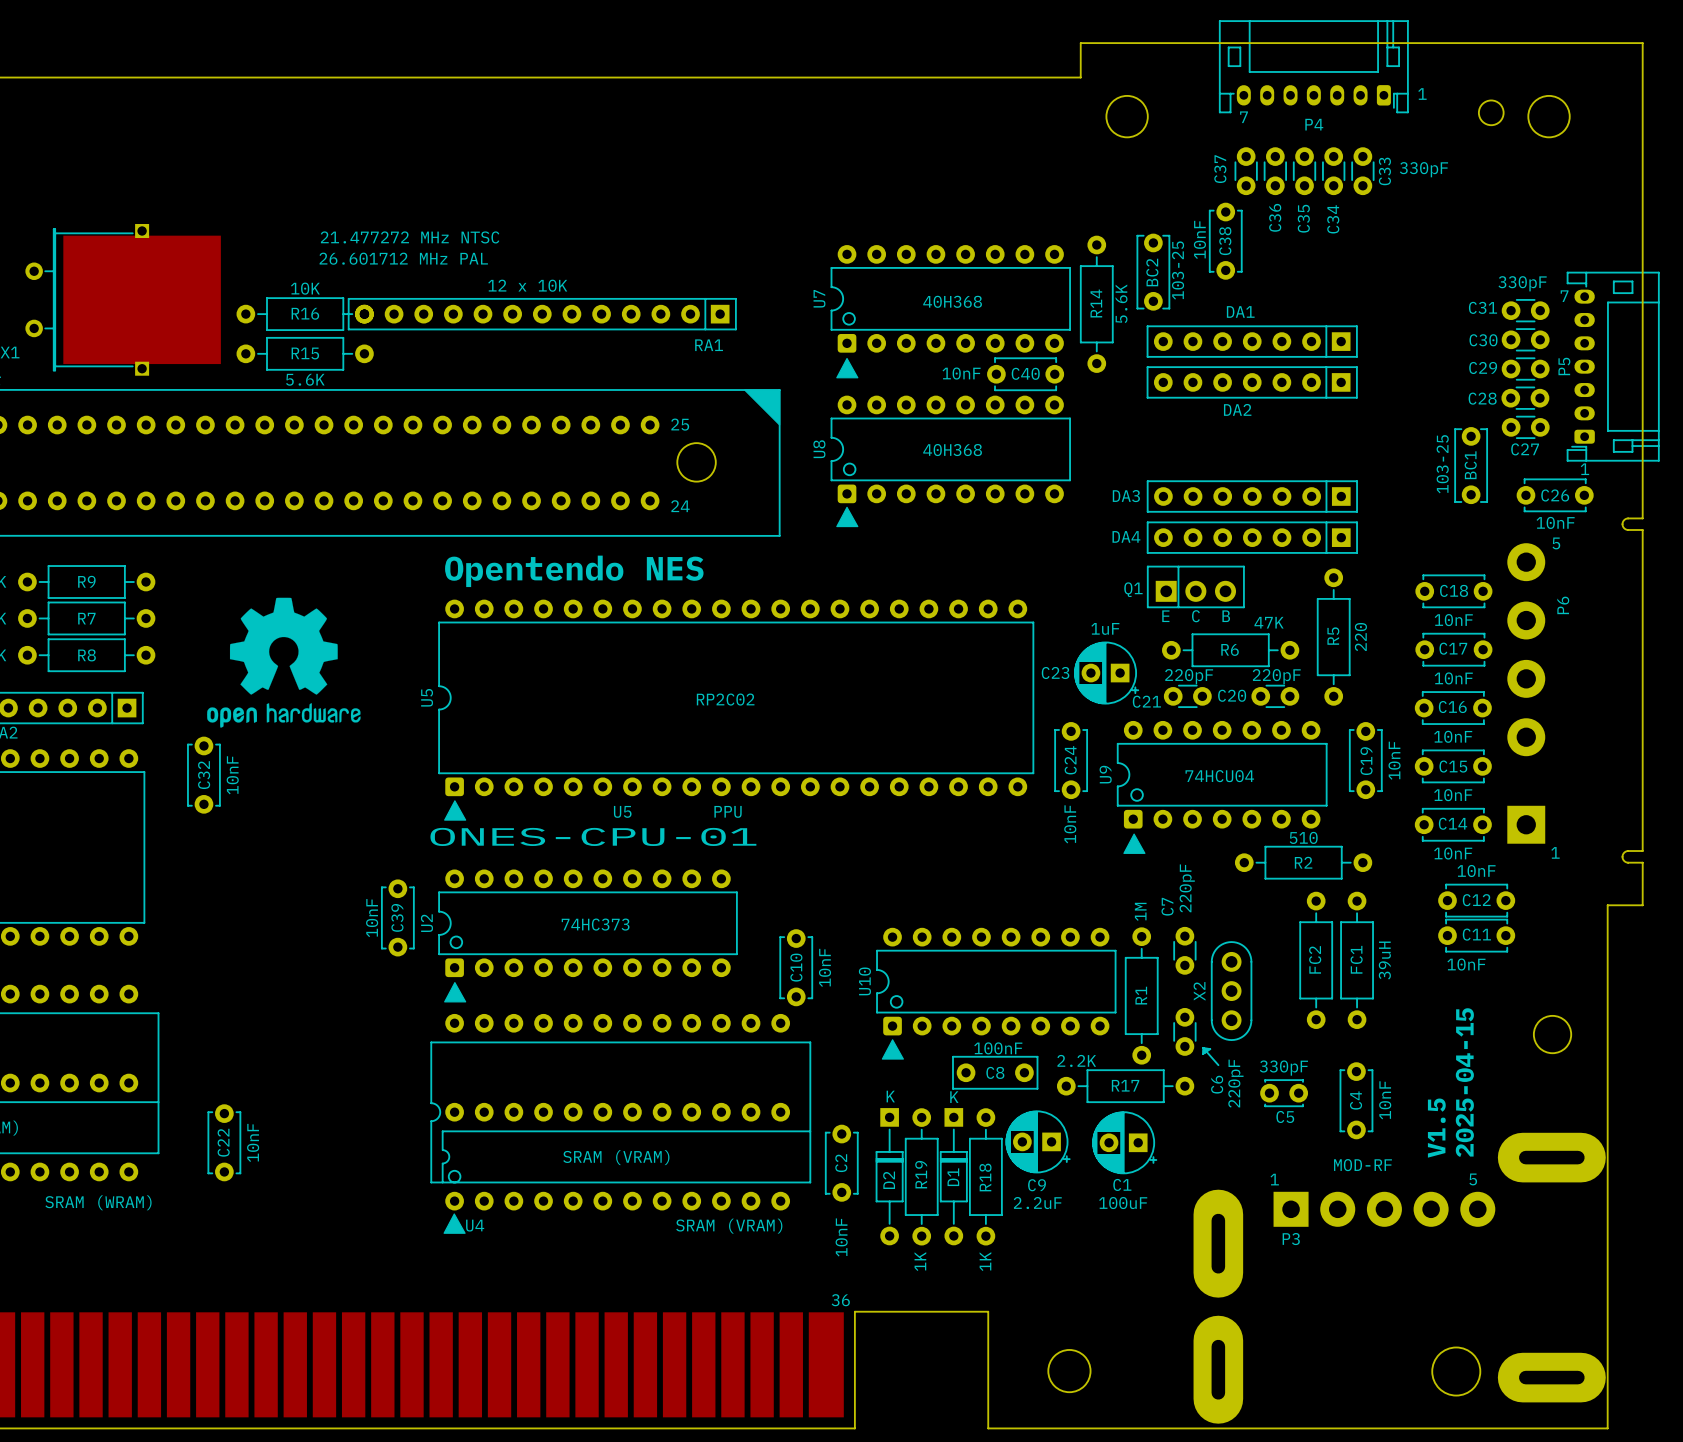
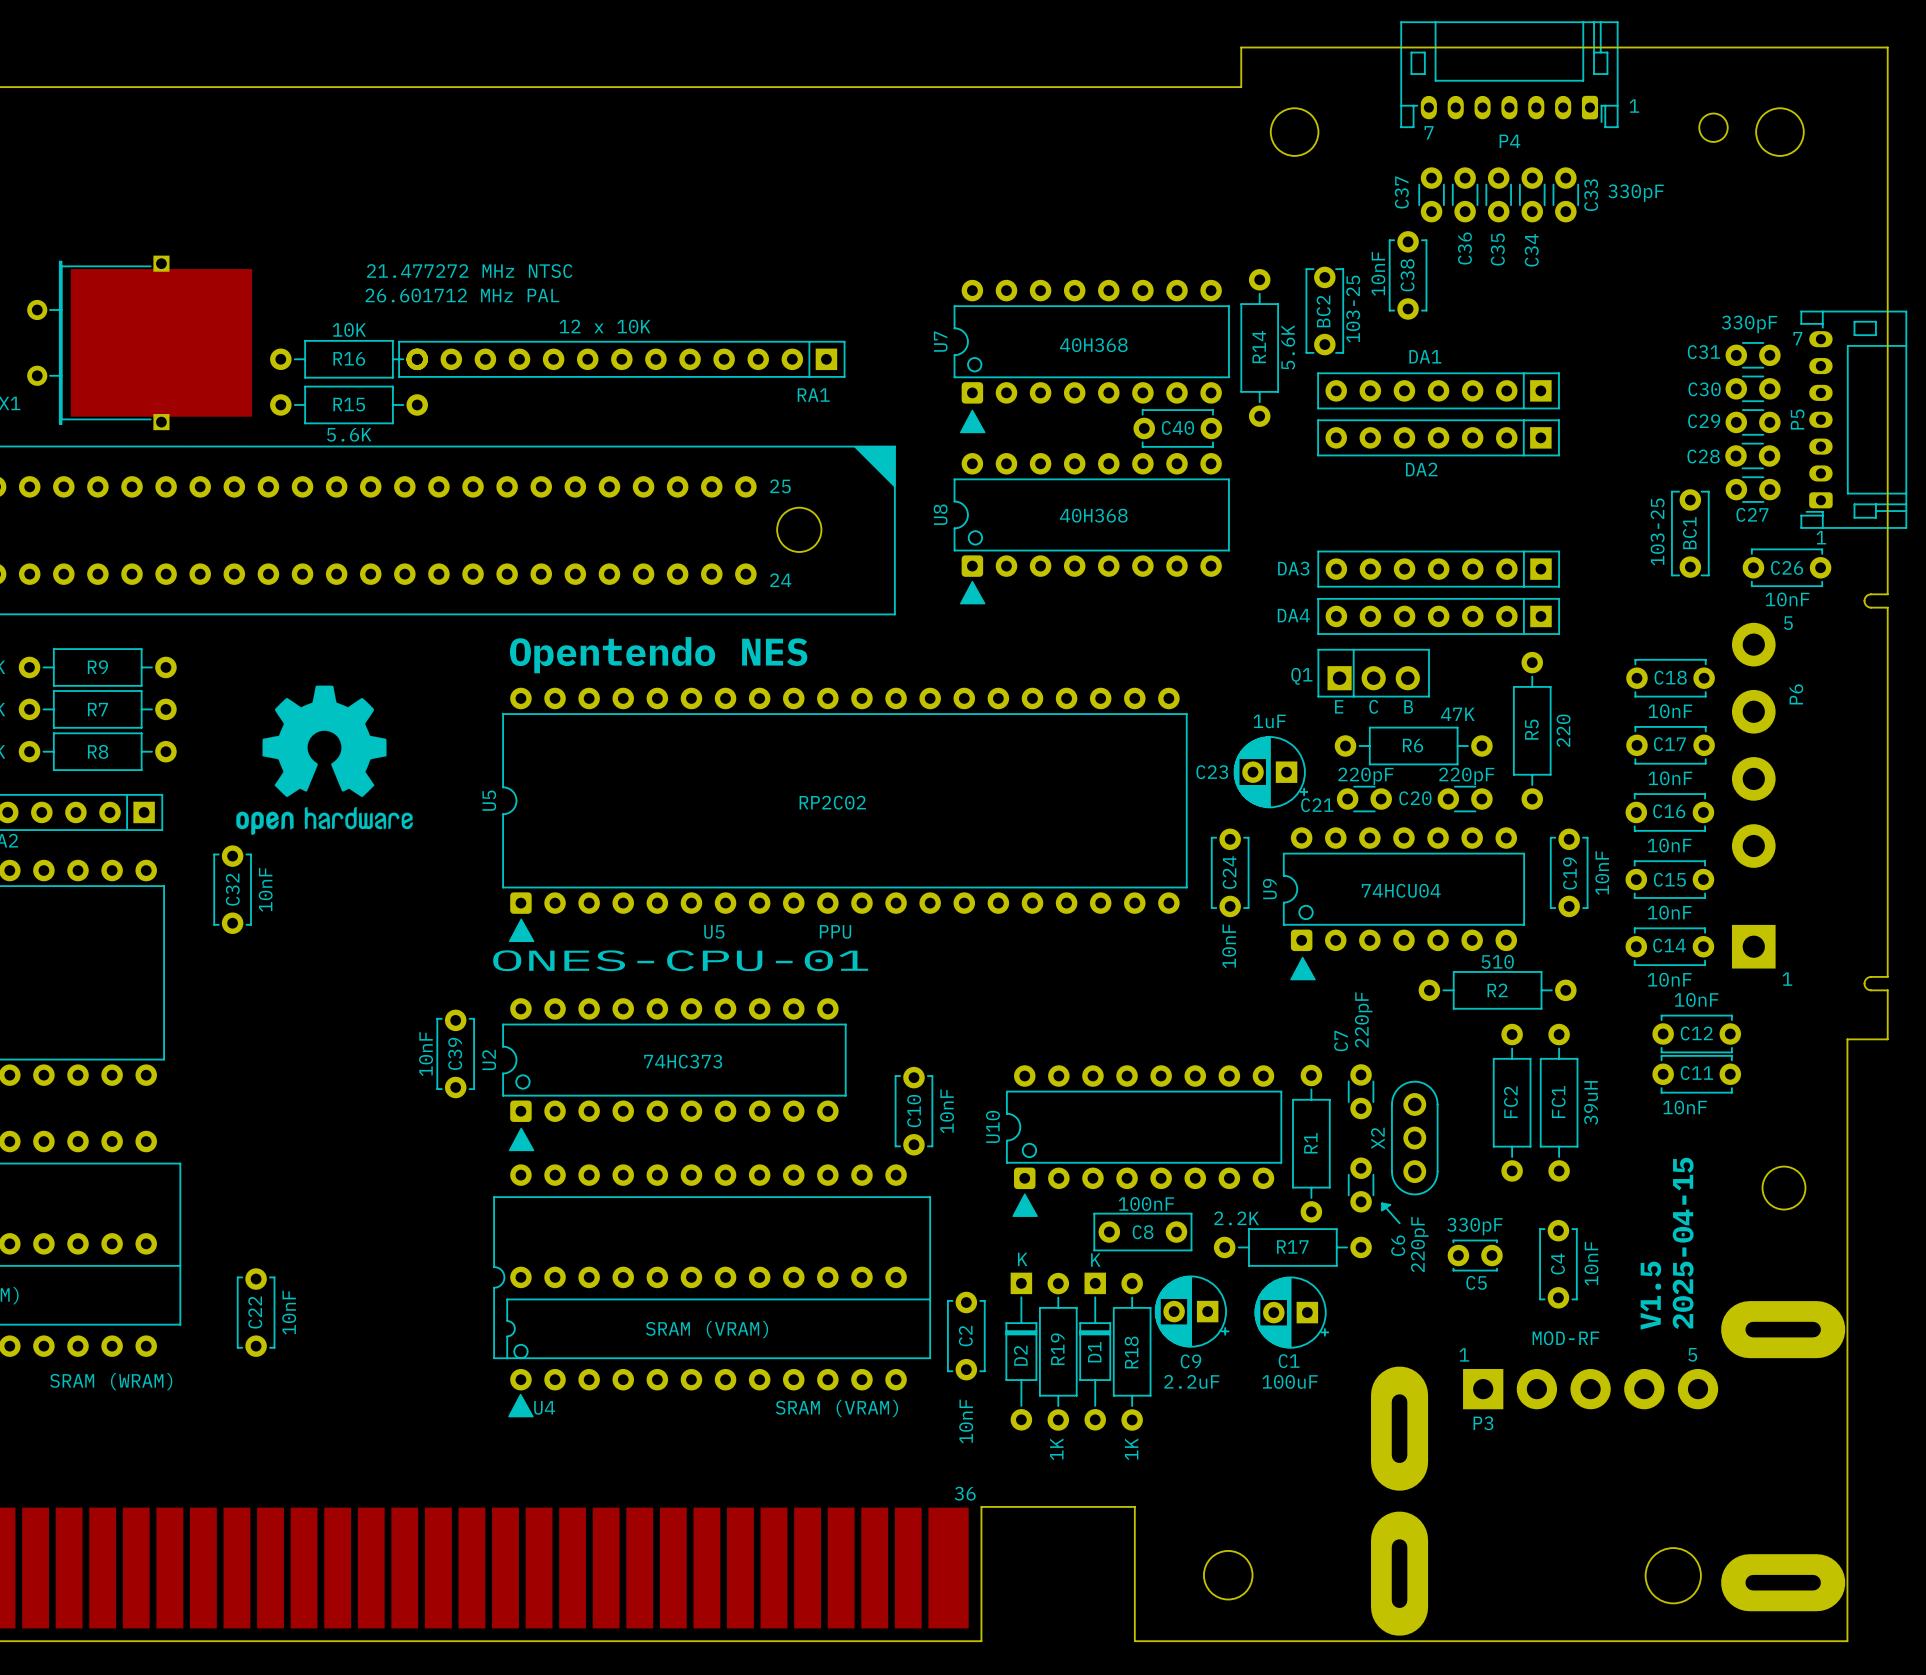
C40 value: 10nF (961, 373) -> none
R1 value: 1M (1140, 911) -> none

